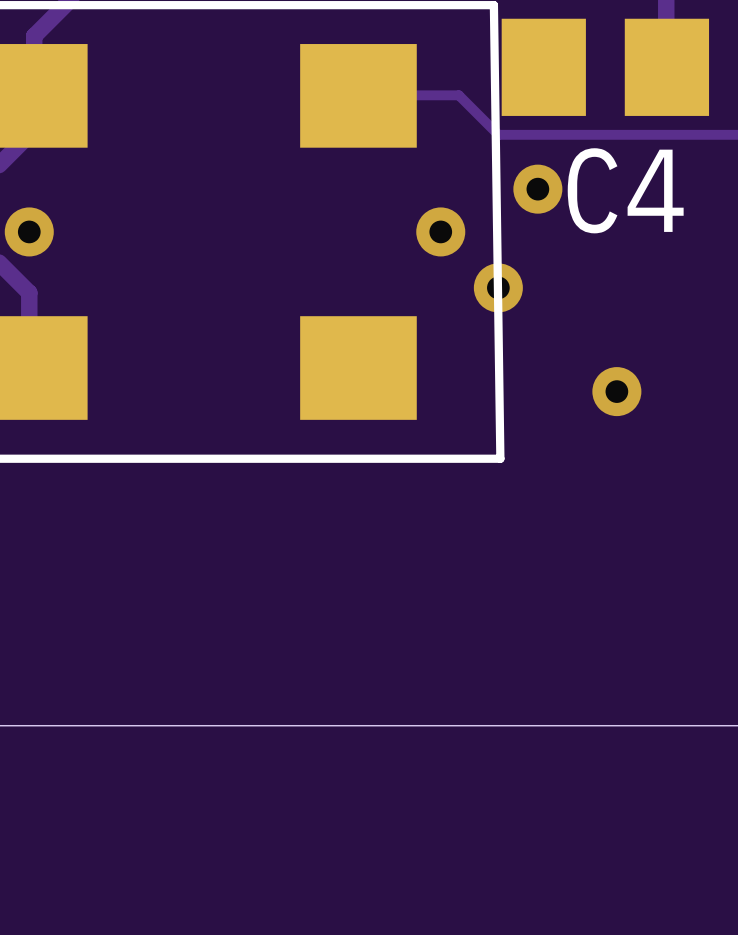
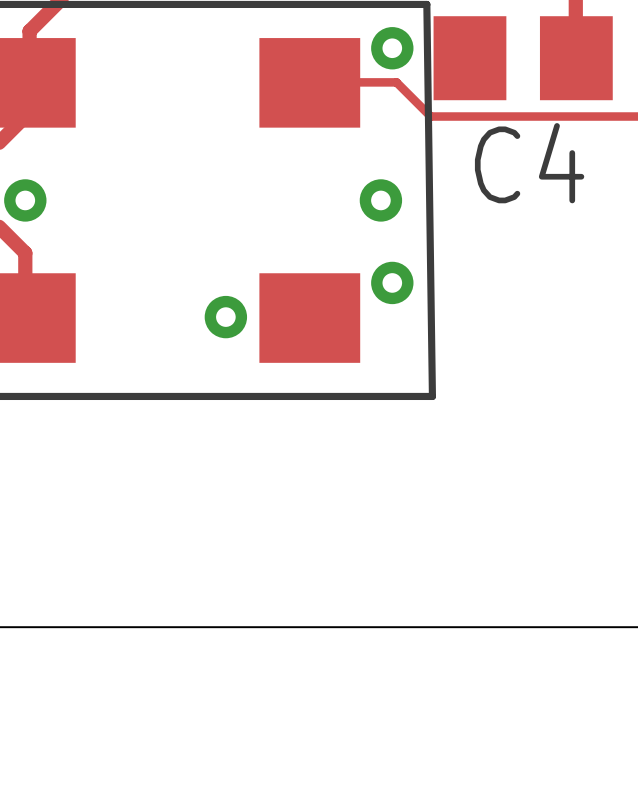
via: none -> (392, 48)
via: (537, 189) -> none
via position: (498, 287) -> (392, 282)
via: none -> (225, 317)
via: (616, 391) -> none

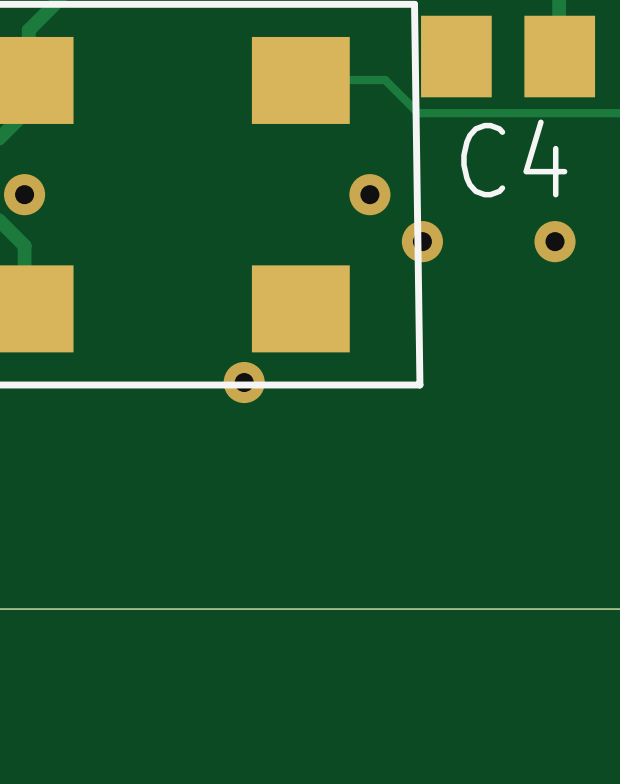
via: (392, 48) -> none
via: none -> (555, 241)
via position: (392, 282) -> (422, 241)
via position: (225, 317) -> (244, 382)

